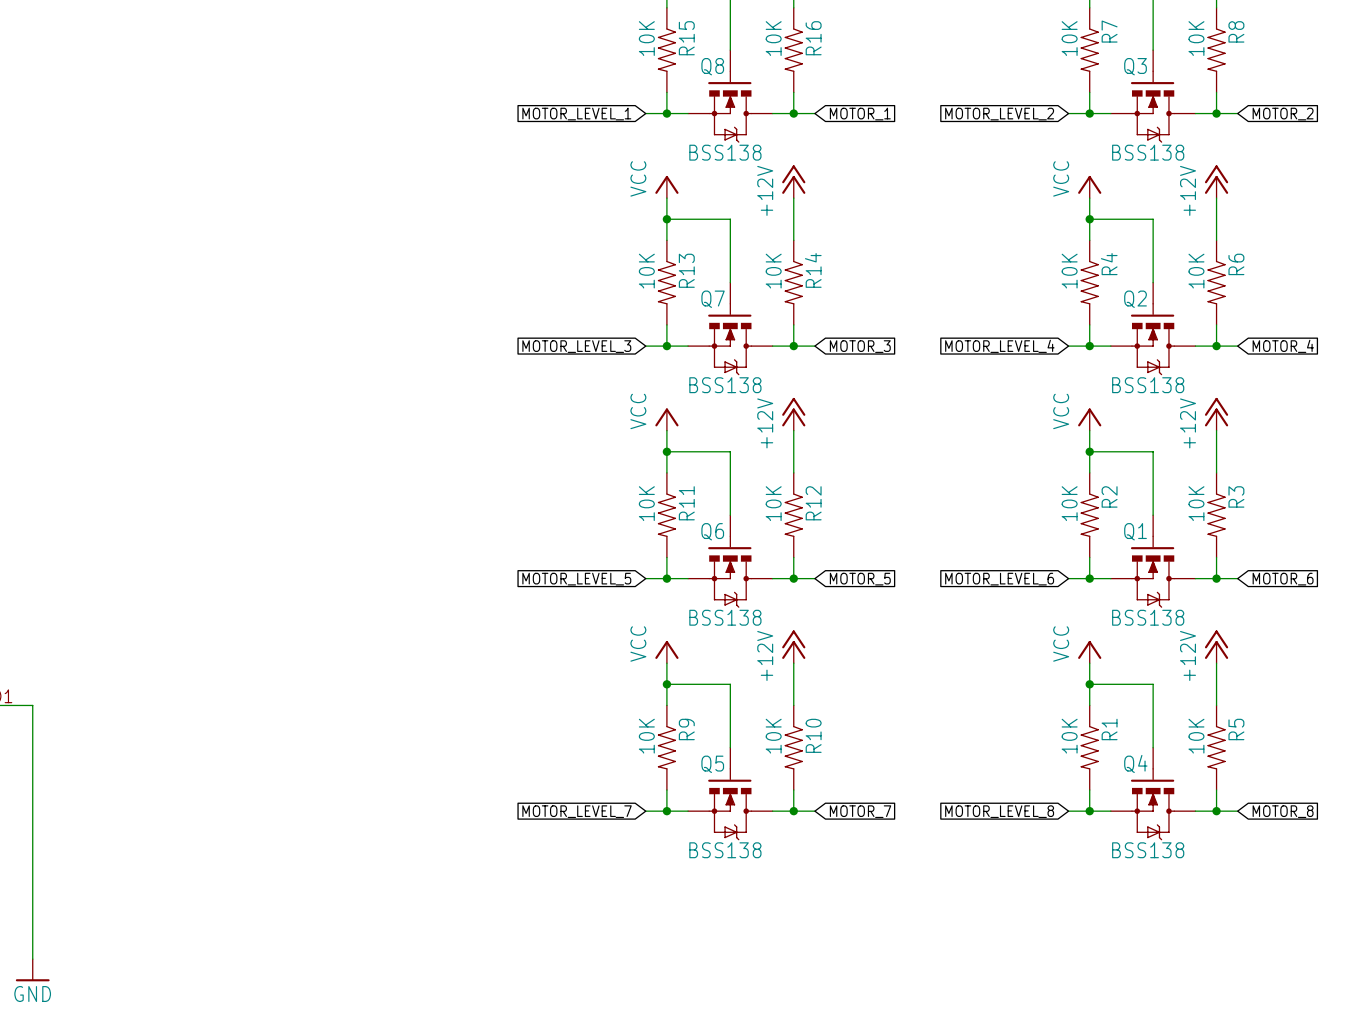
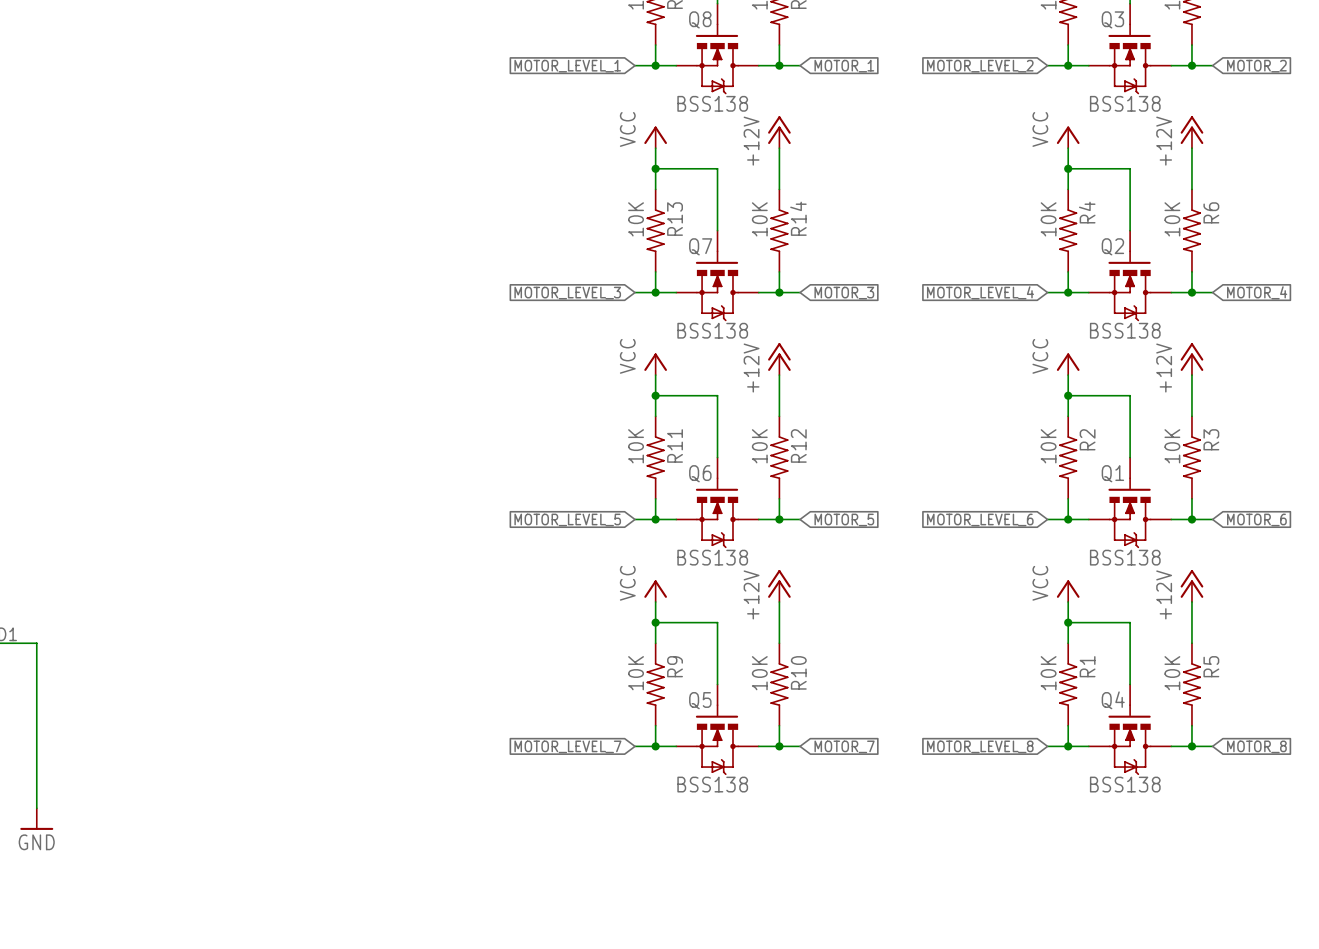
wire: (32, 874) (32, 959) -> none
power symbol position: GND (32, 970) -> GND (36, 819)

